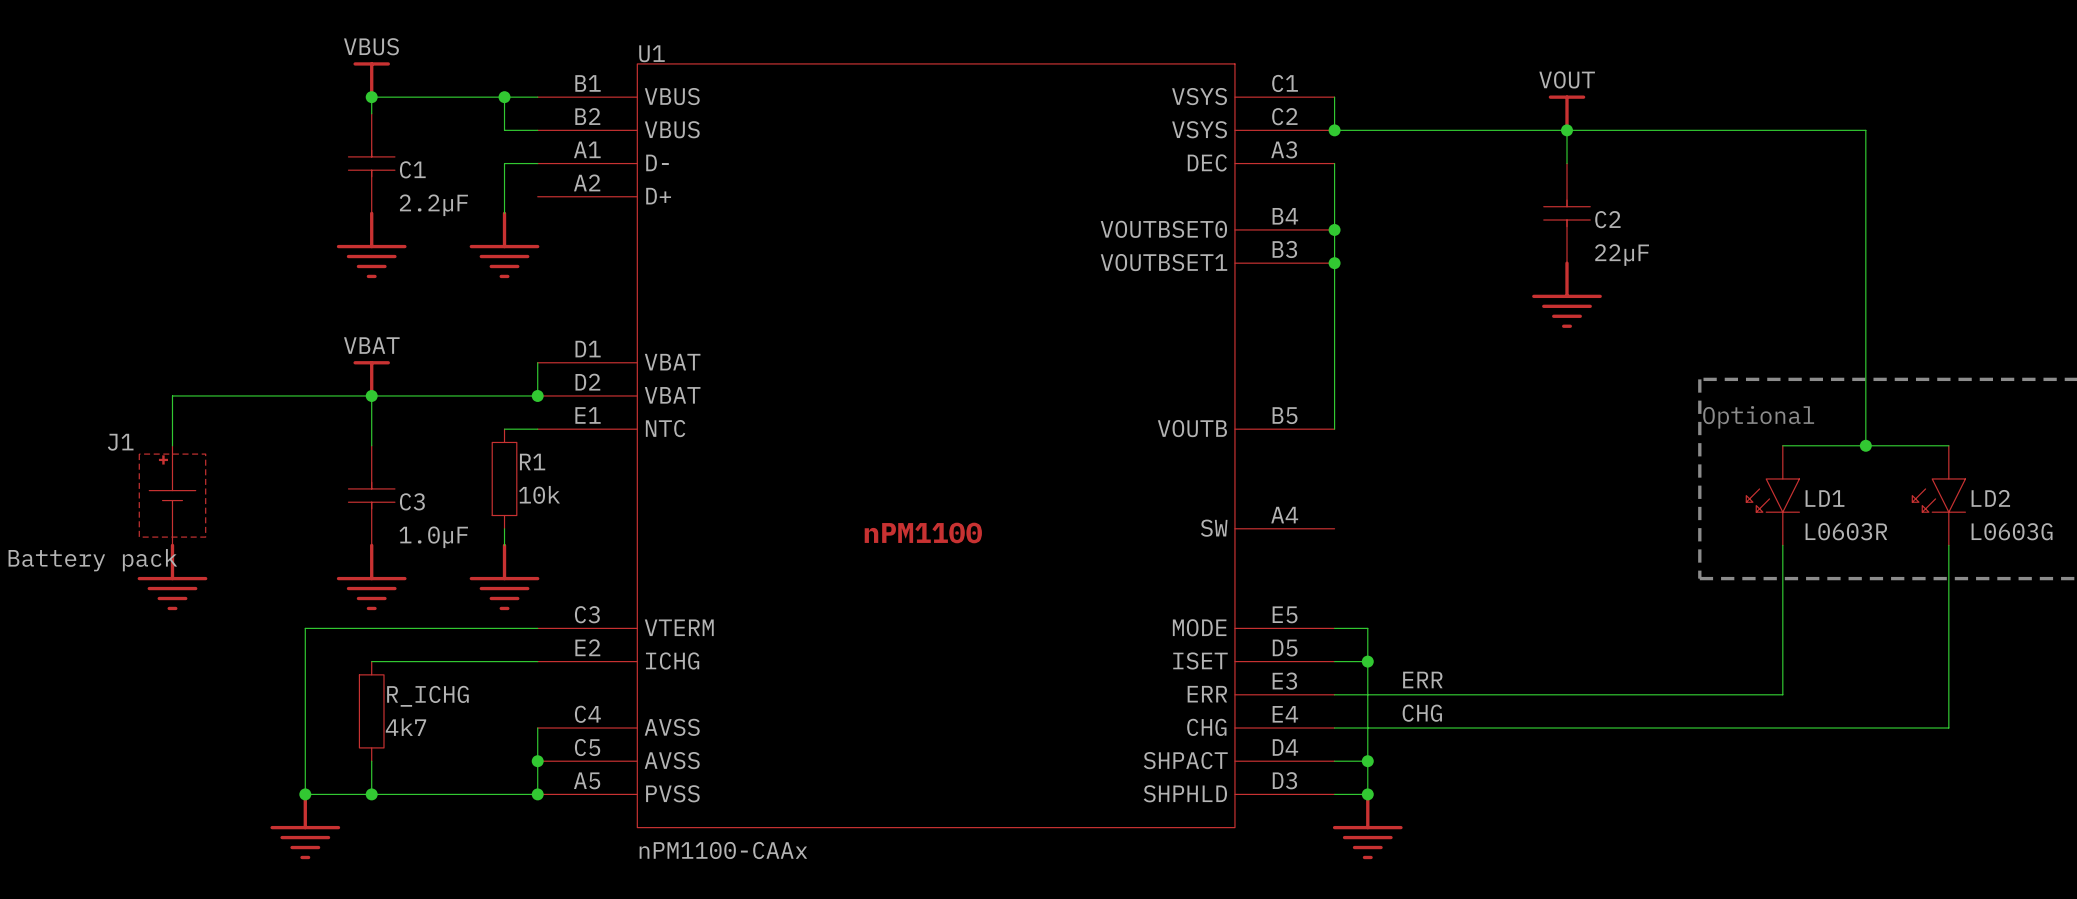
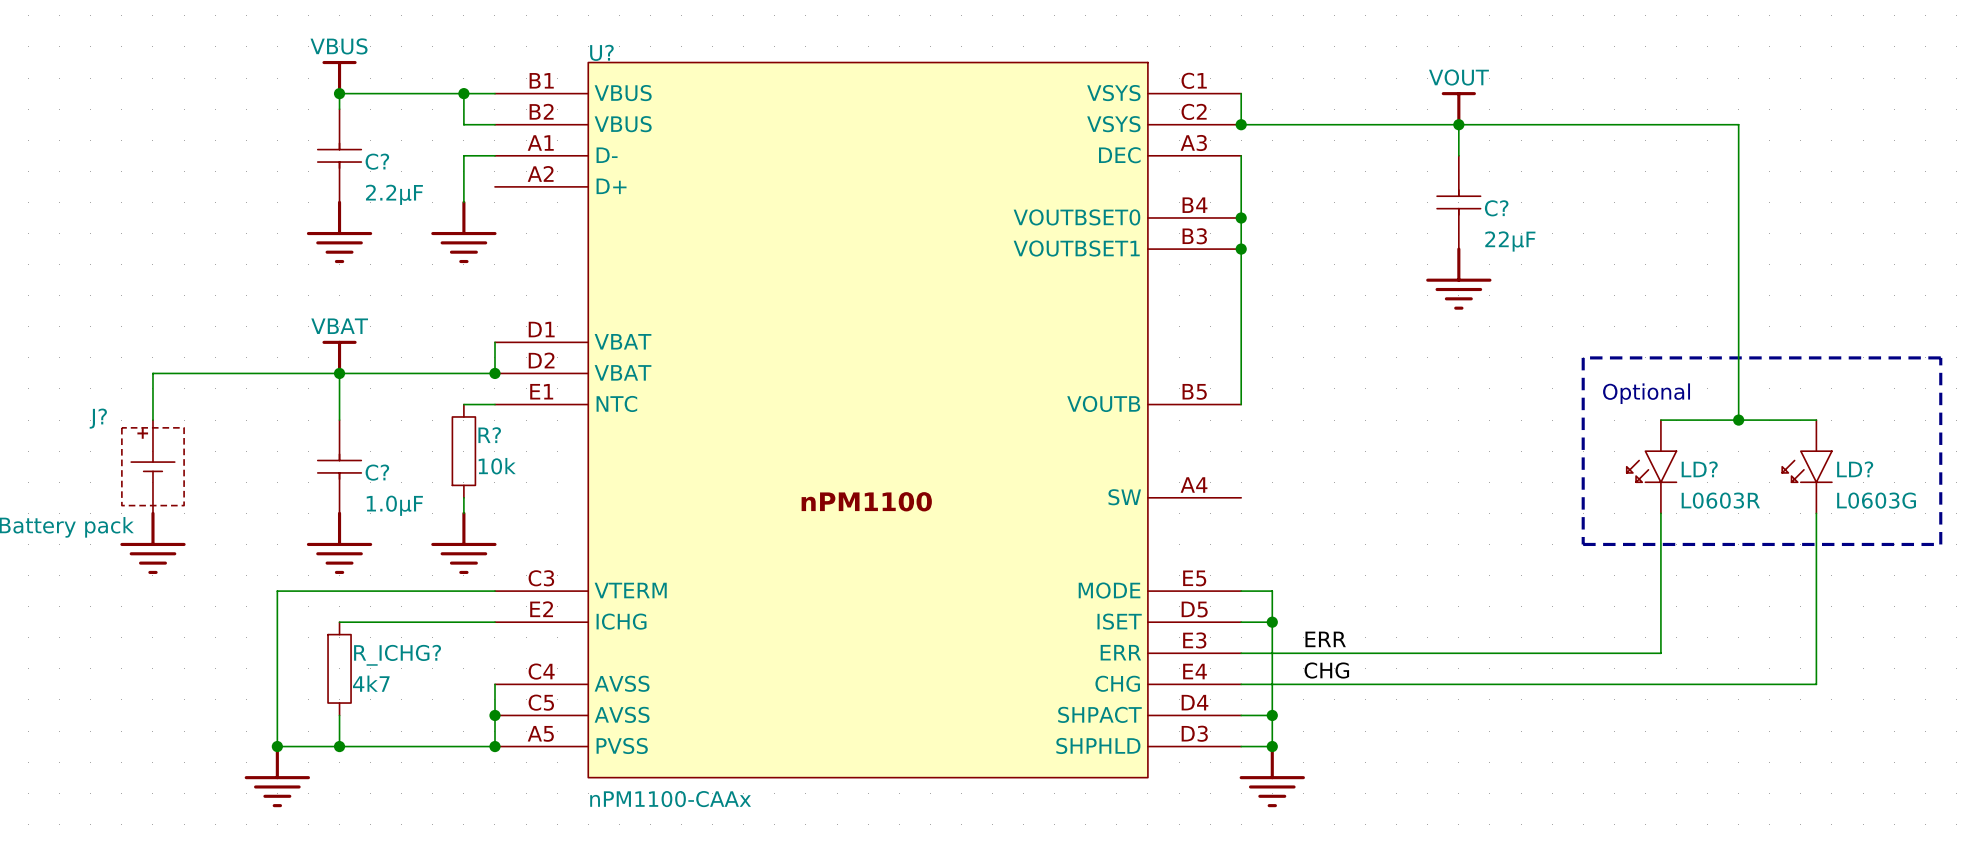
U1 name: U1 (651, 53) -> U? (601, 52)
C1 name: C1 (412, 169) -> C? (377, 161)
C2 name: C2 (1607, 219) -> C? (1496, 208)
J1 name: J1 (120, 442) -> J? (98, 418)
R1 name: R1 (532, 462) -> R? (489, 435)
LD1 name: LD1 (1825, 498) -> LD? (1699, 469)
LD2 name: LD2 (1990, 498) -> LD? (1855, 469)
C3 name: C3 (412, 501) -> C? (377, 472)
R_ICHG name: R_ICHG (427, 696) -> R_ICHG? (397, 655)

